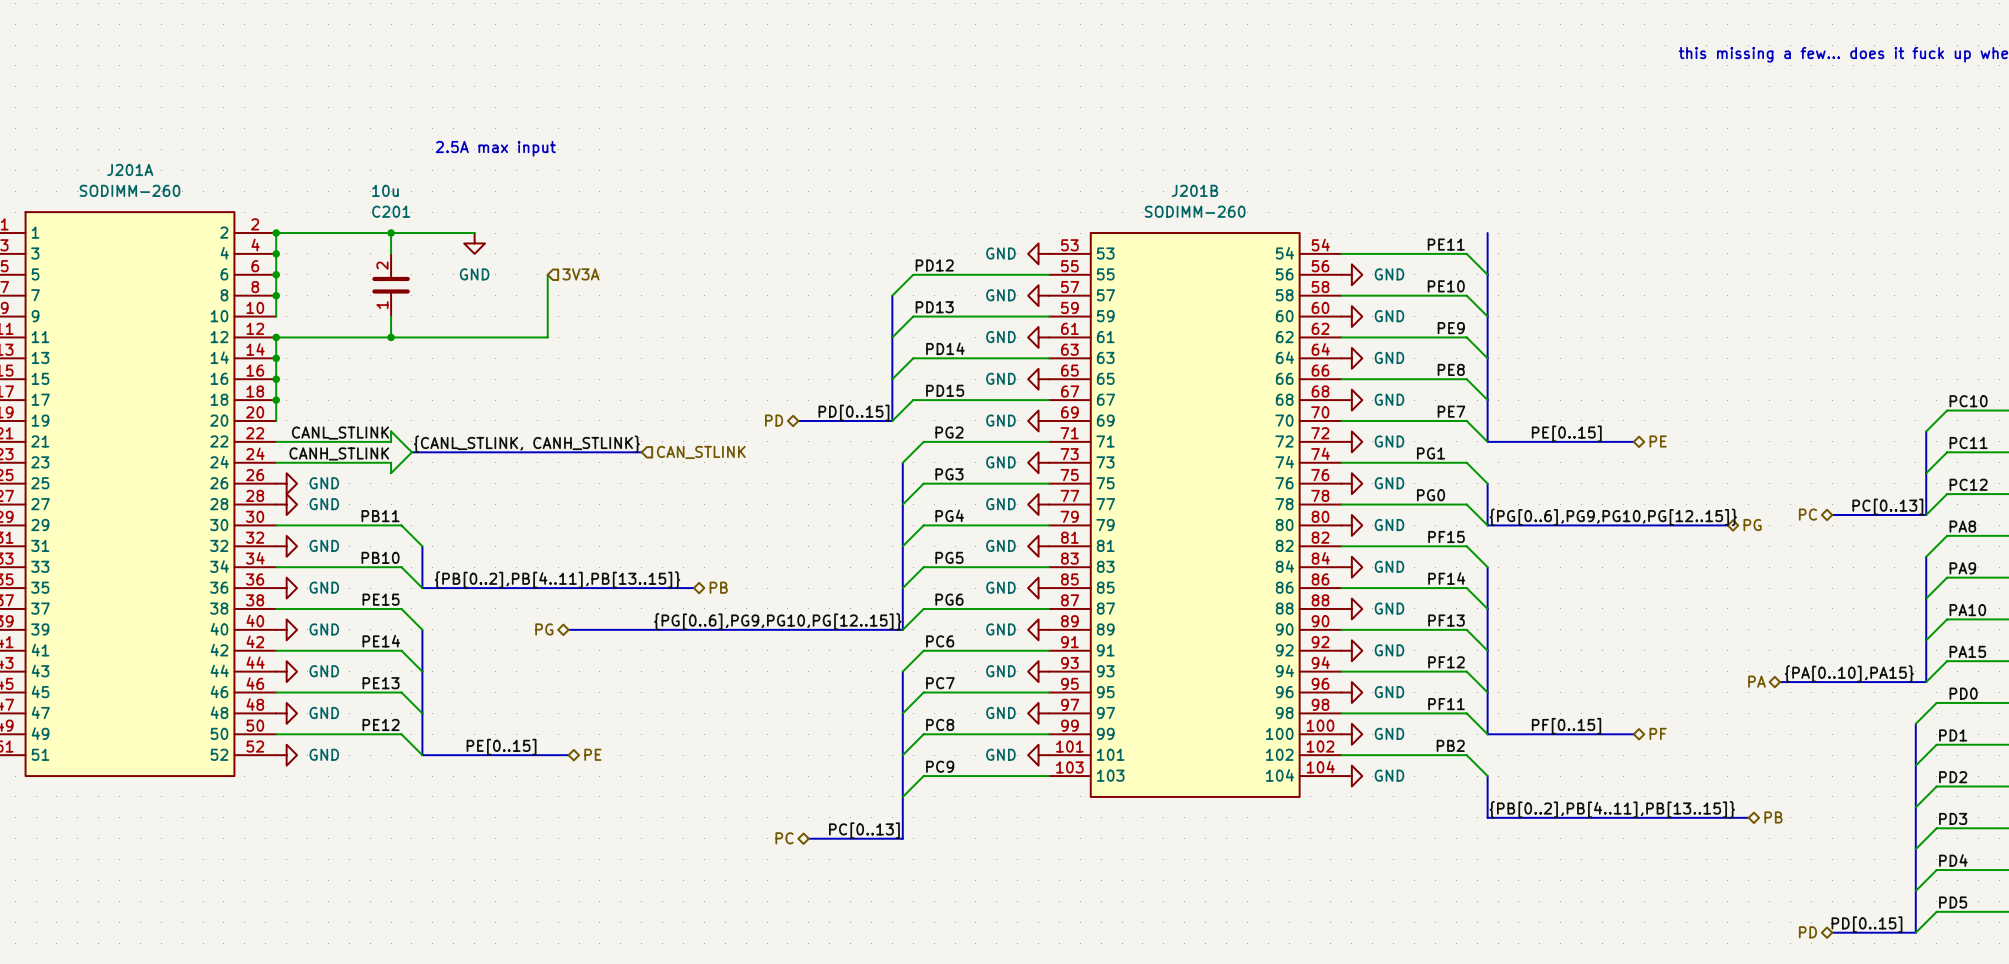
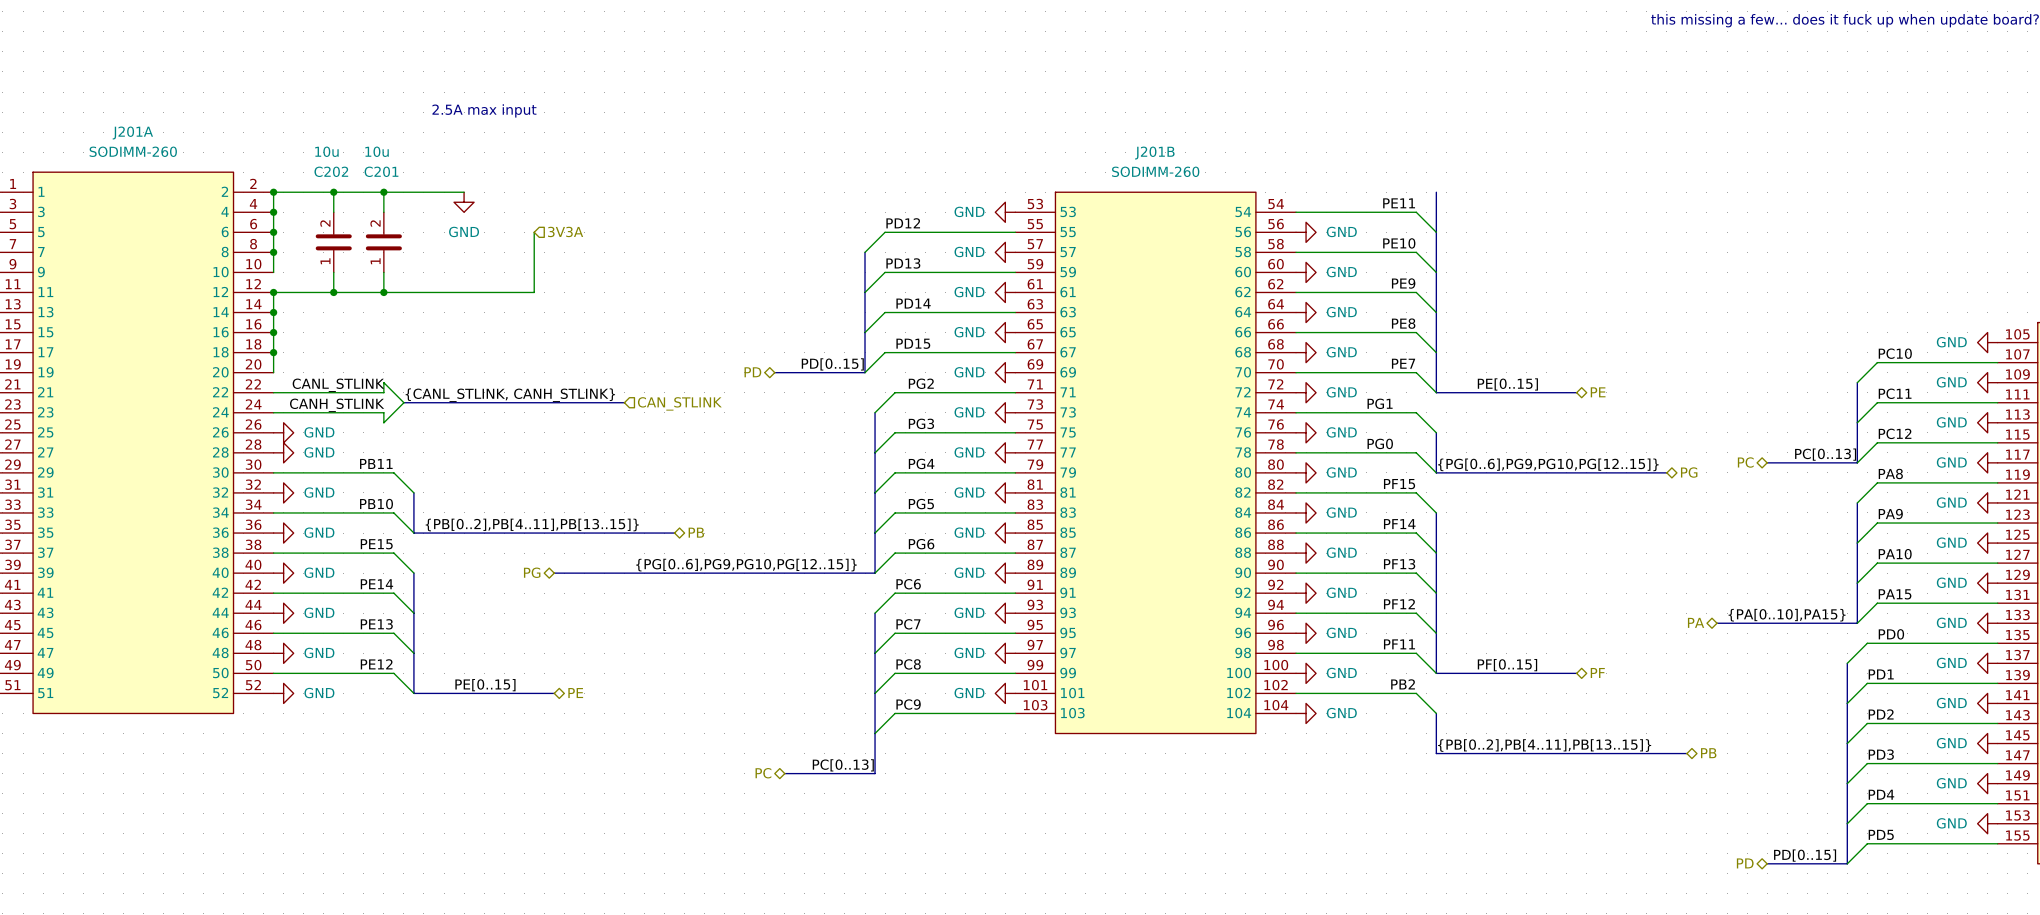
wire: none -> (333, 192) (333, 212)
junction: none -> (333, 192)
C202: none -> 10u (333, 242)
wire: none -> (333, 272) (333, 292)
junction: none -> (333, 292)

